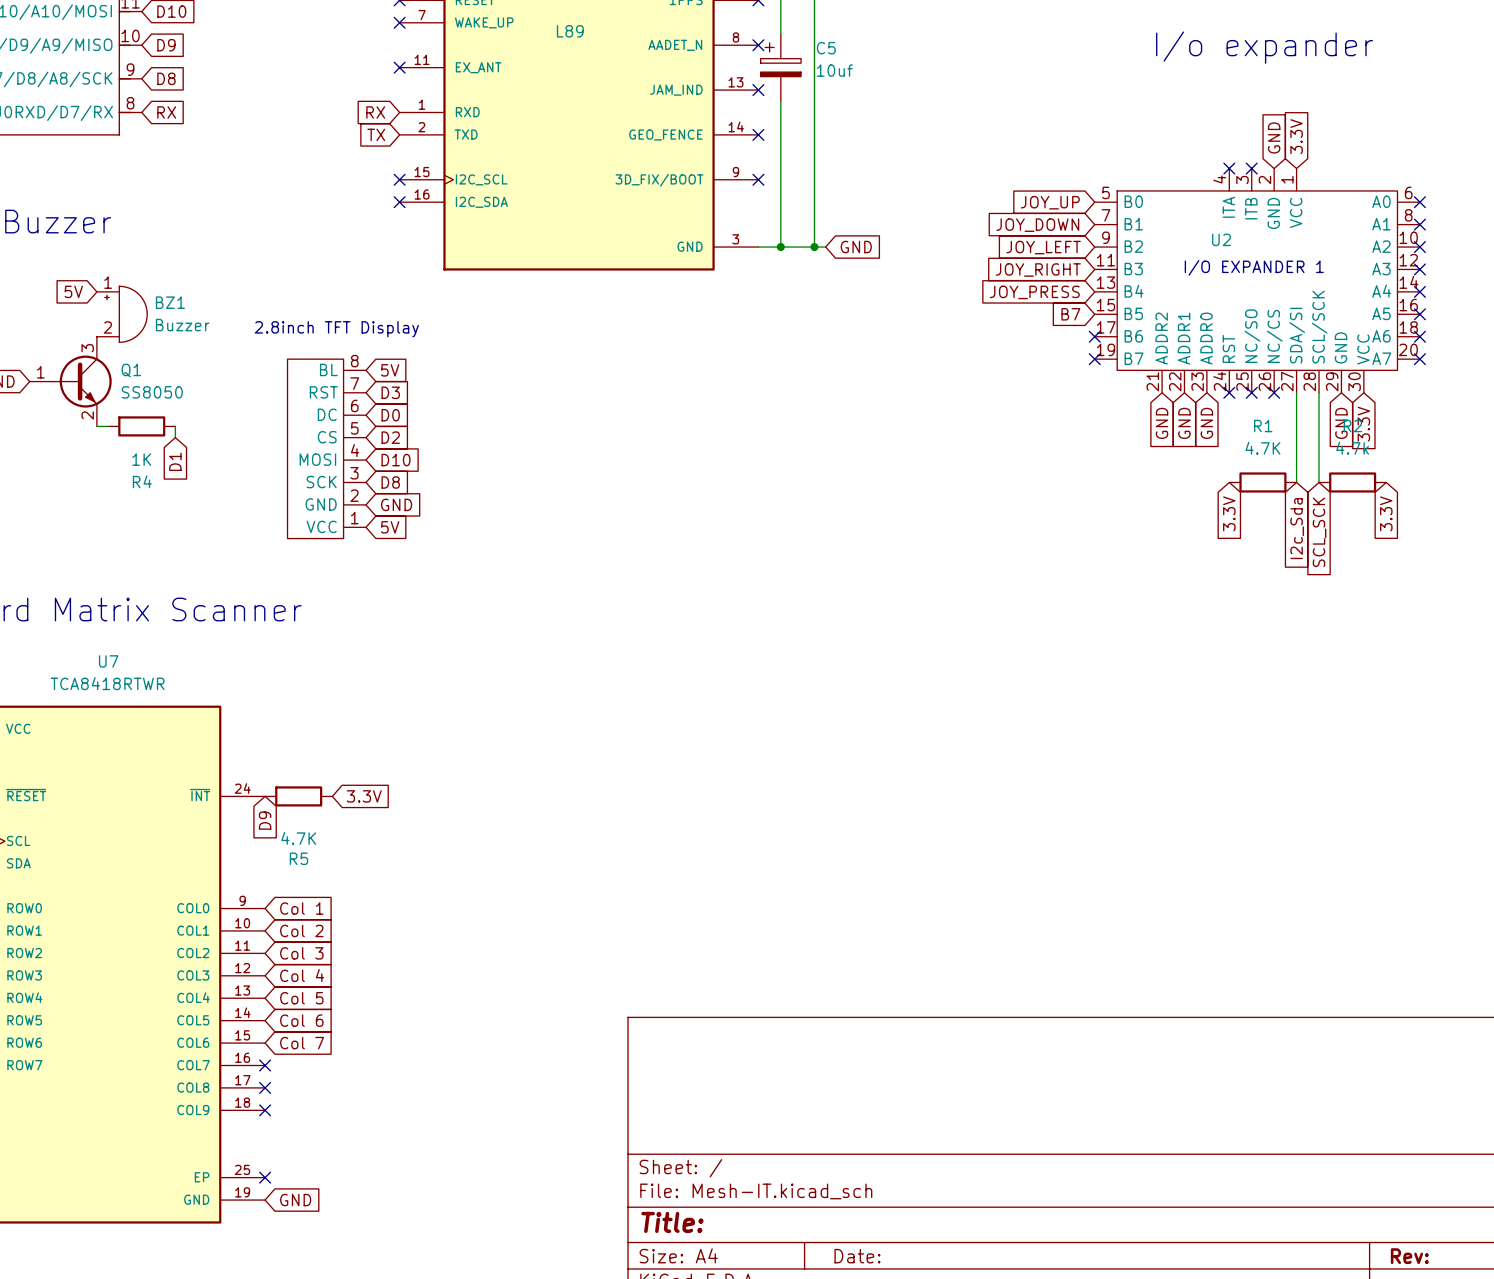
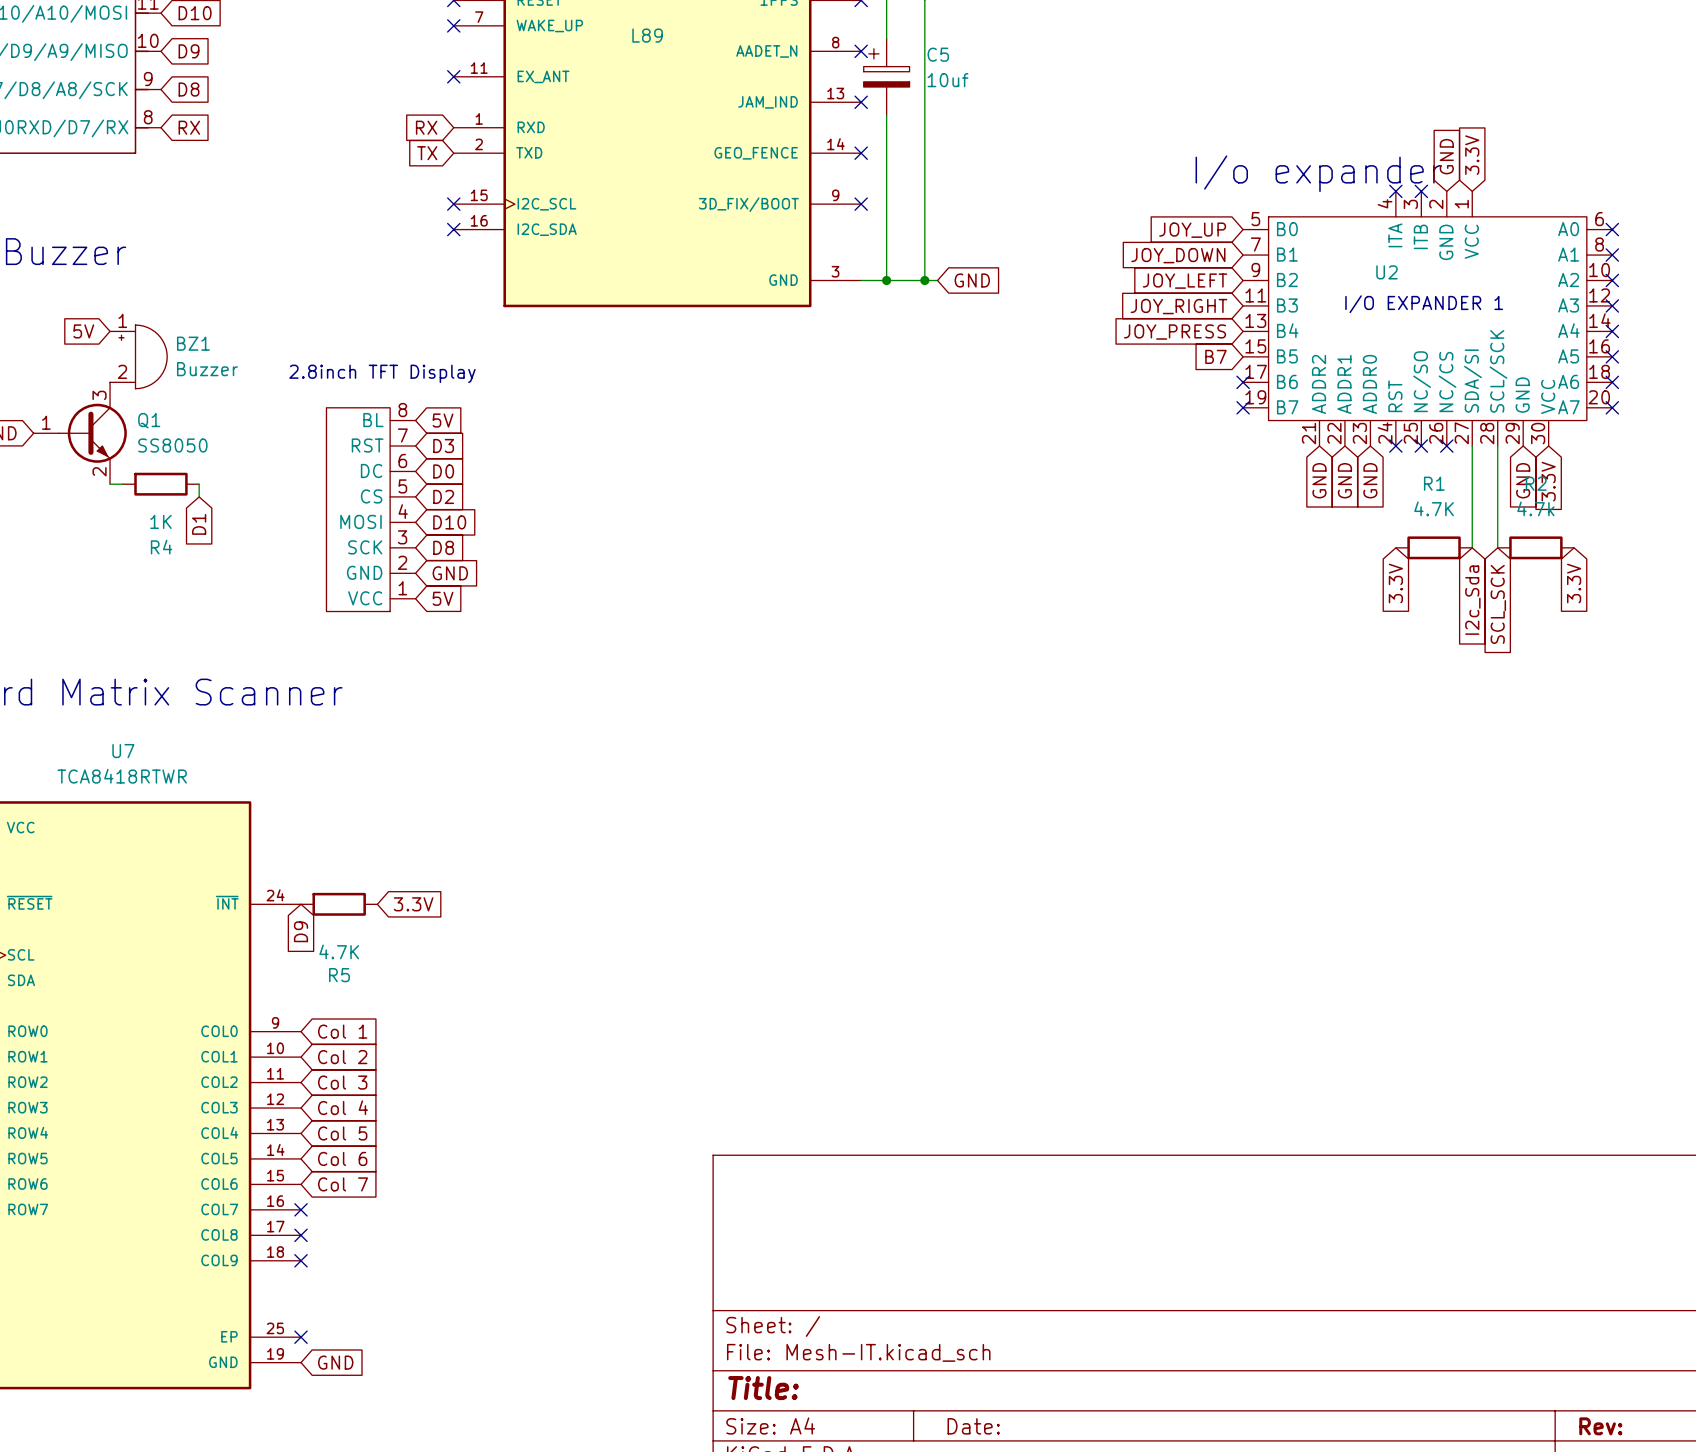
text position: I/o expander (1264, 47) -> I/o expander (1318, 173)

